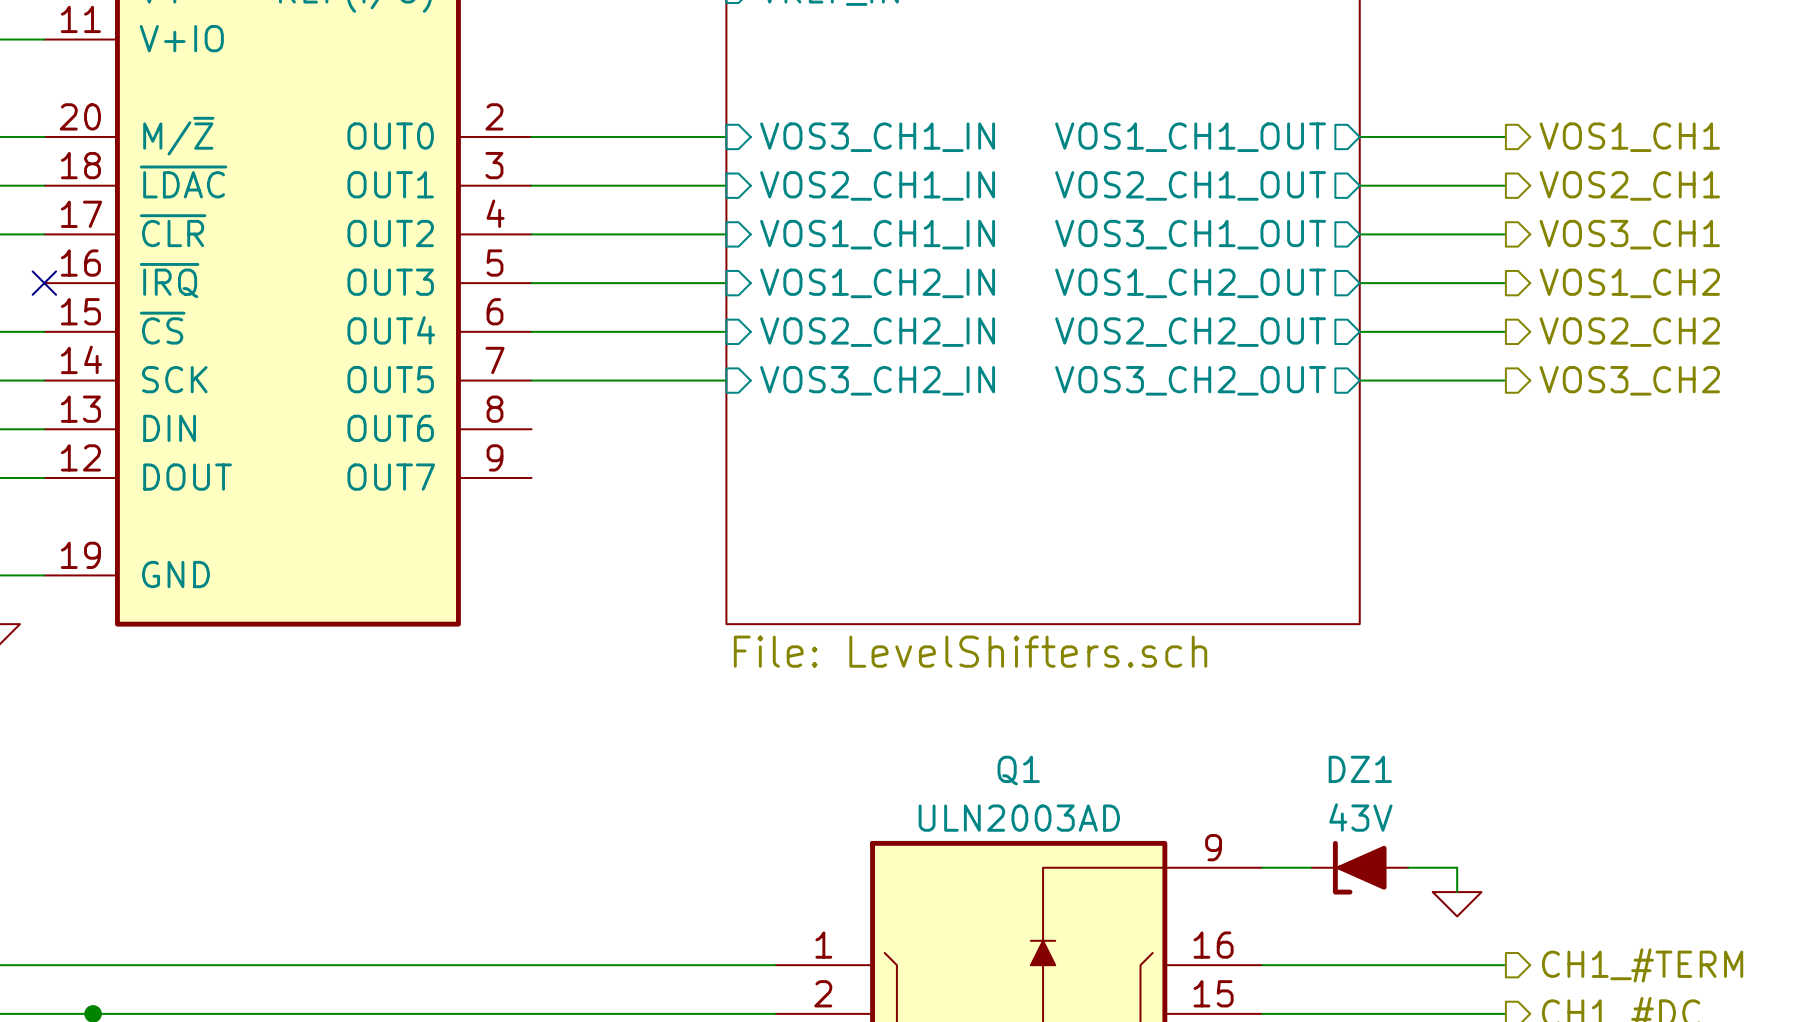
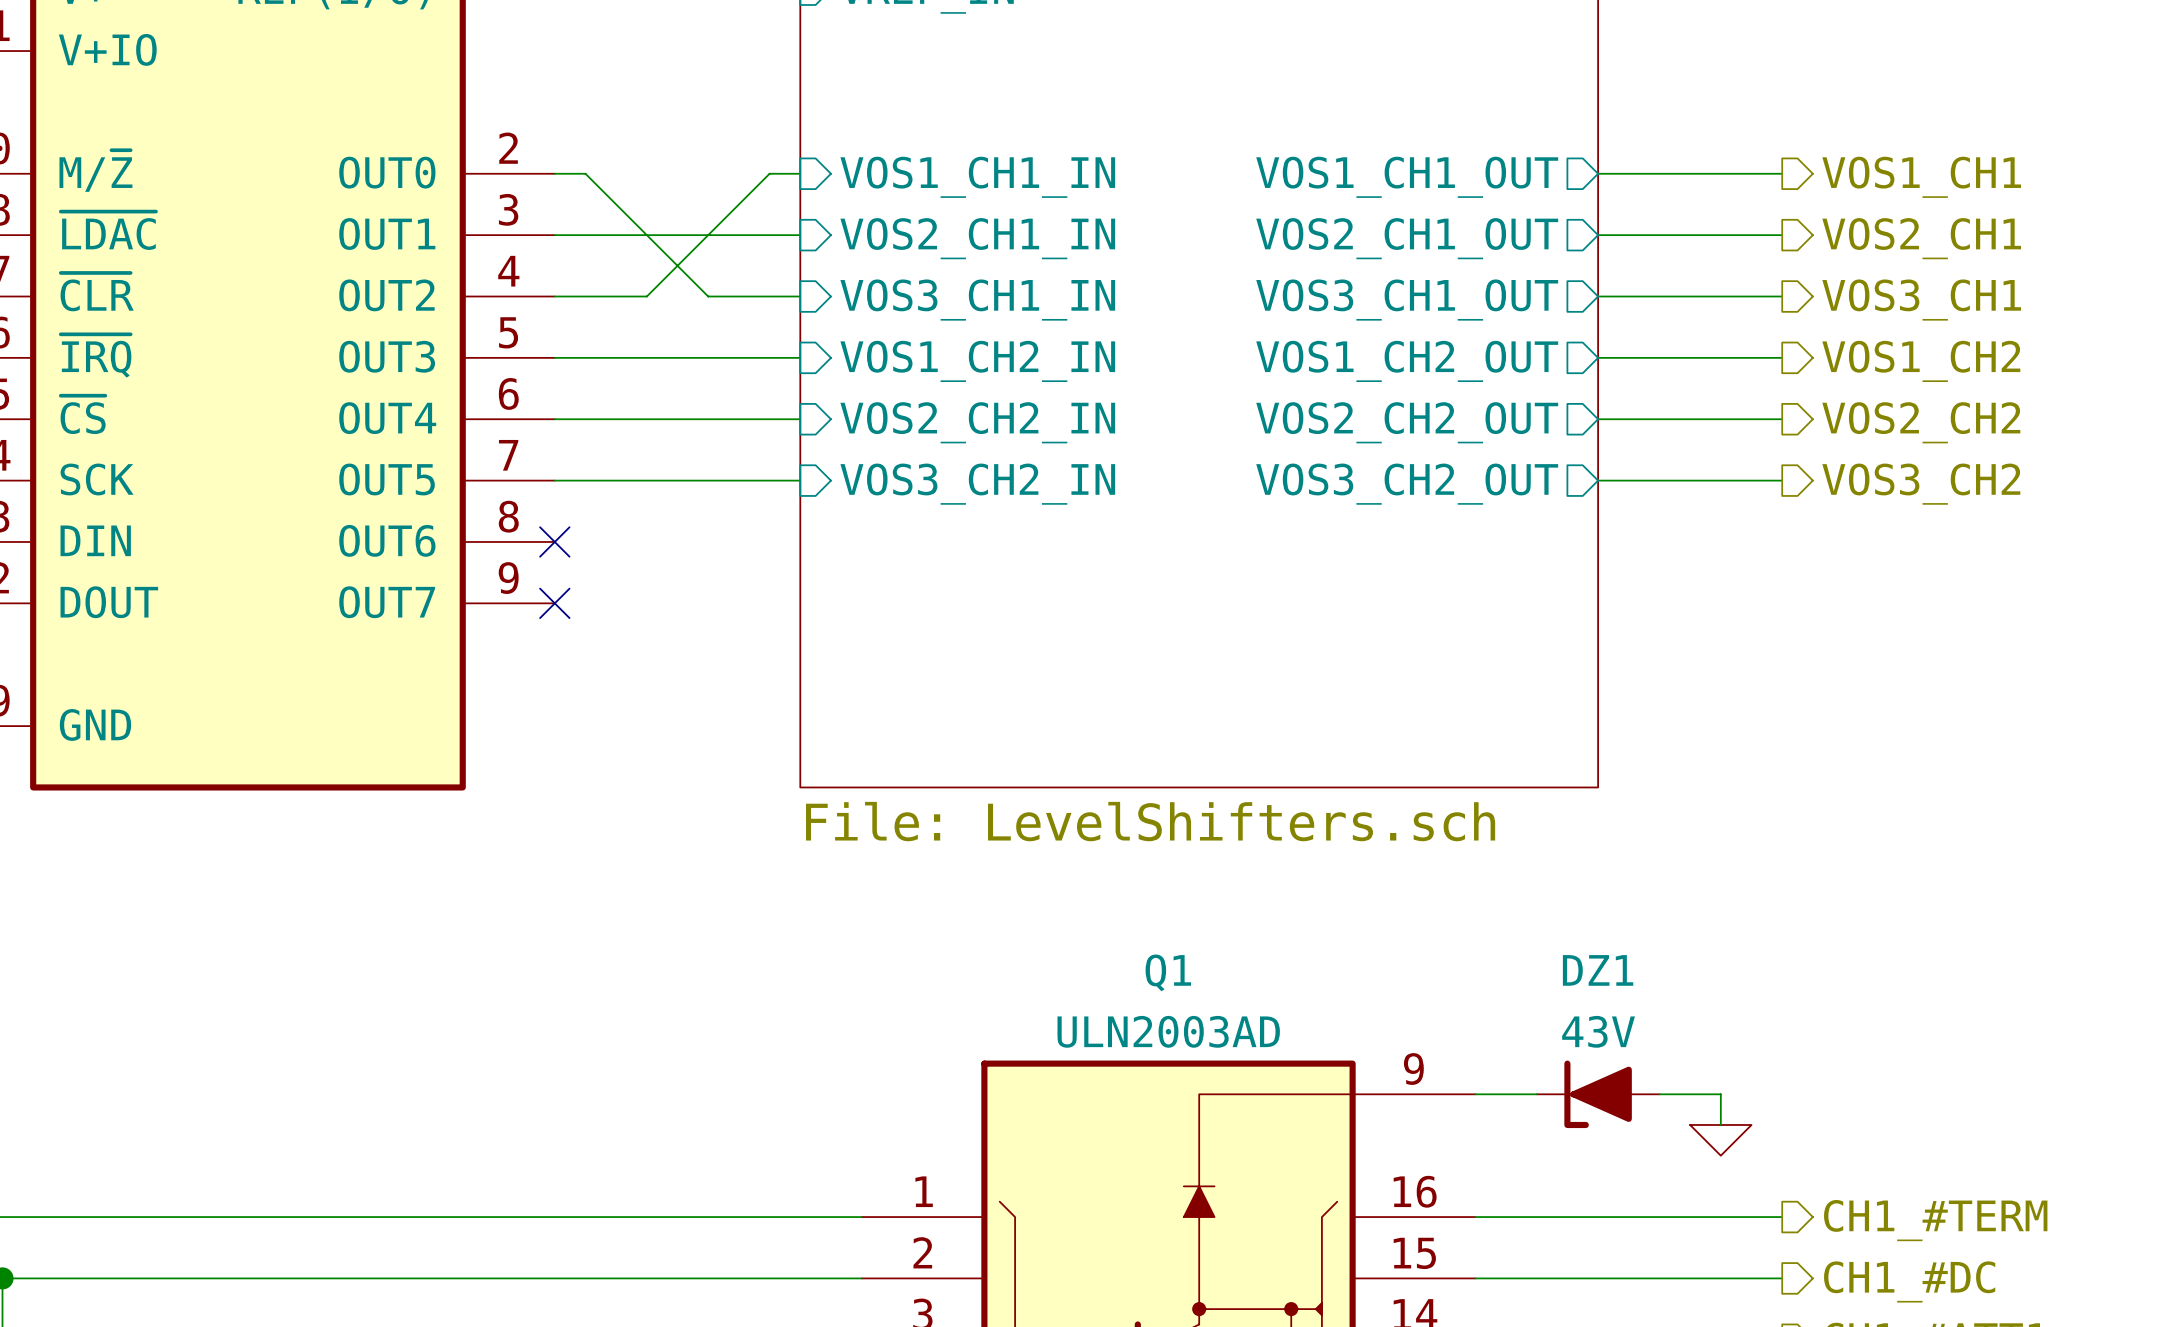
wire: (555, 136) (702, 136) -> (646, 296) (769, 173)
sheet pin: VOS3_CH1_IN (877, 137) -> VOS1_CH1_IN (977, 177)
wire: (604, 234) (653, 234) -> (585, 173) (708, 296)
sheet pin: VOS1_CH1_IN (877, 234) -> VOS3_CH1_IN (977, 300)
no-connect mark: none -> (554, 541)
no-connect mark: none -> (554, 603)

